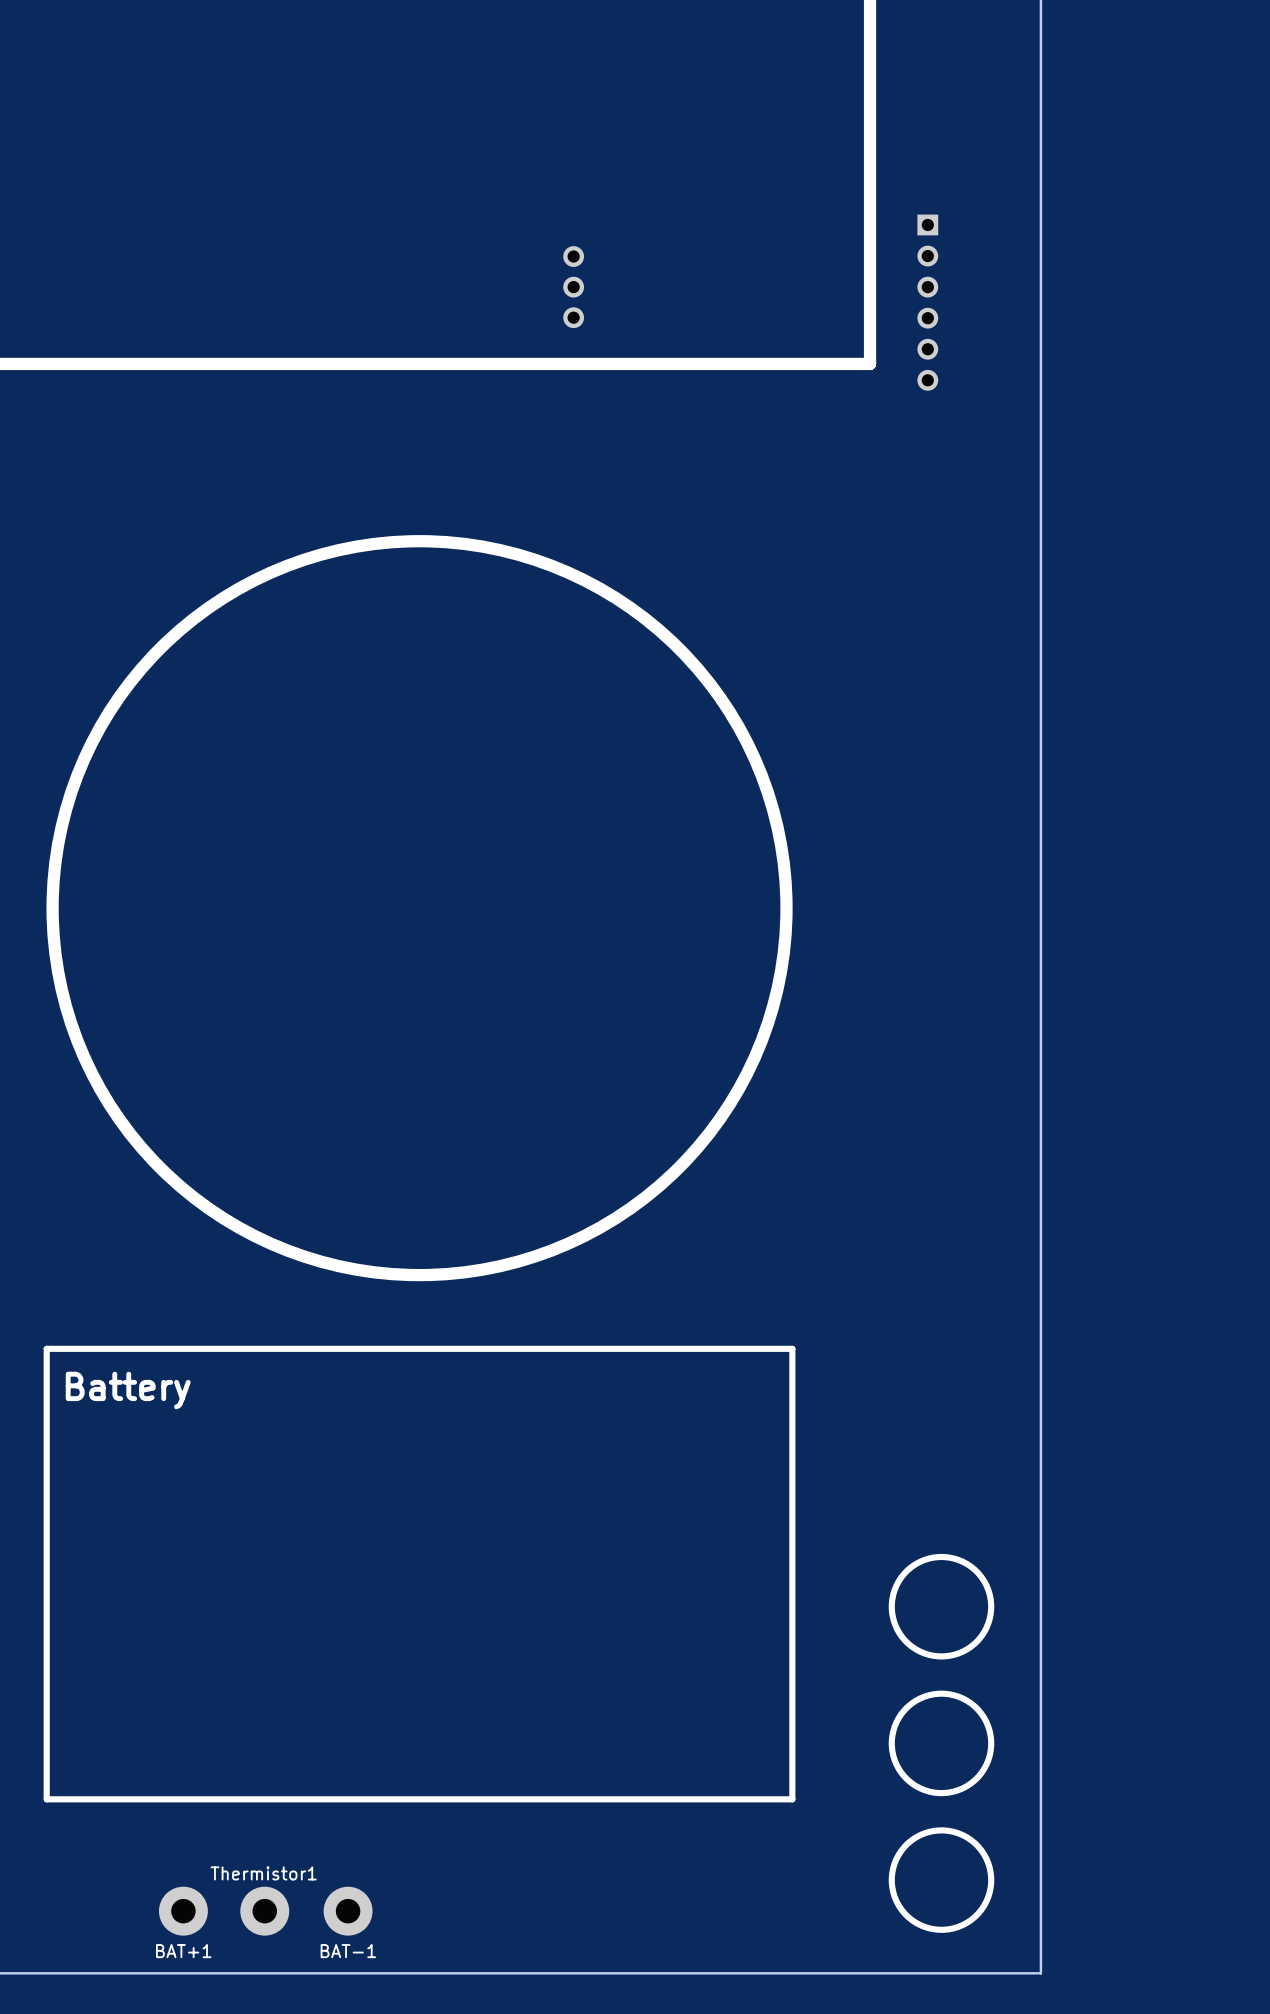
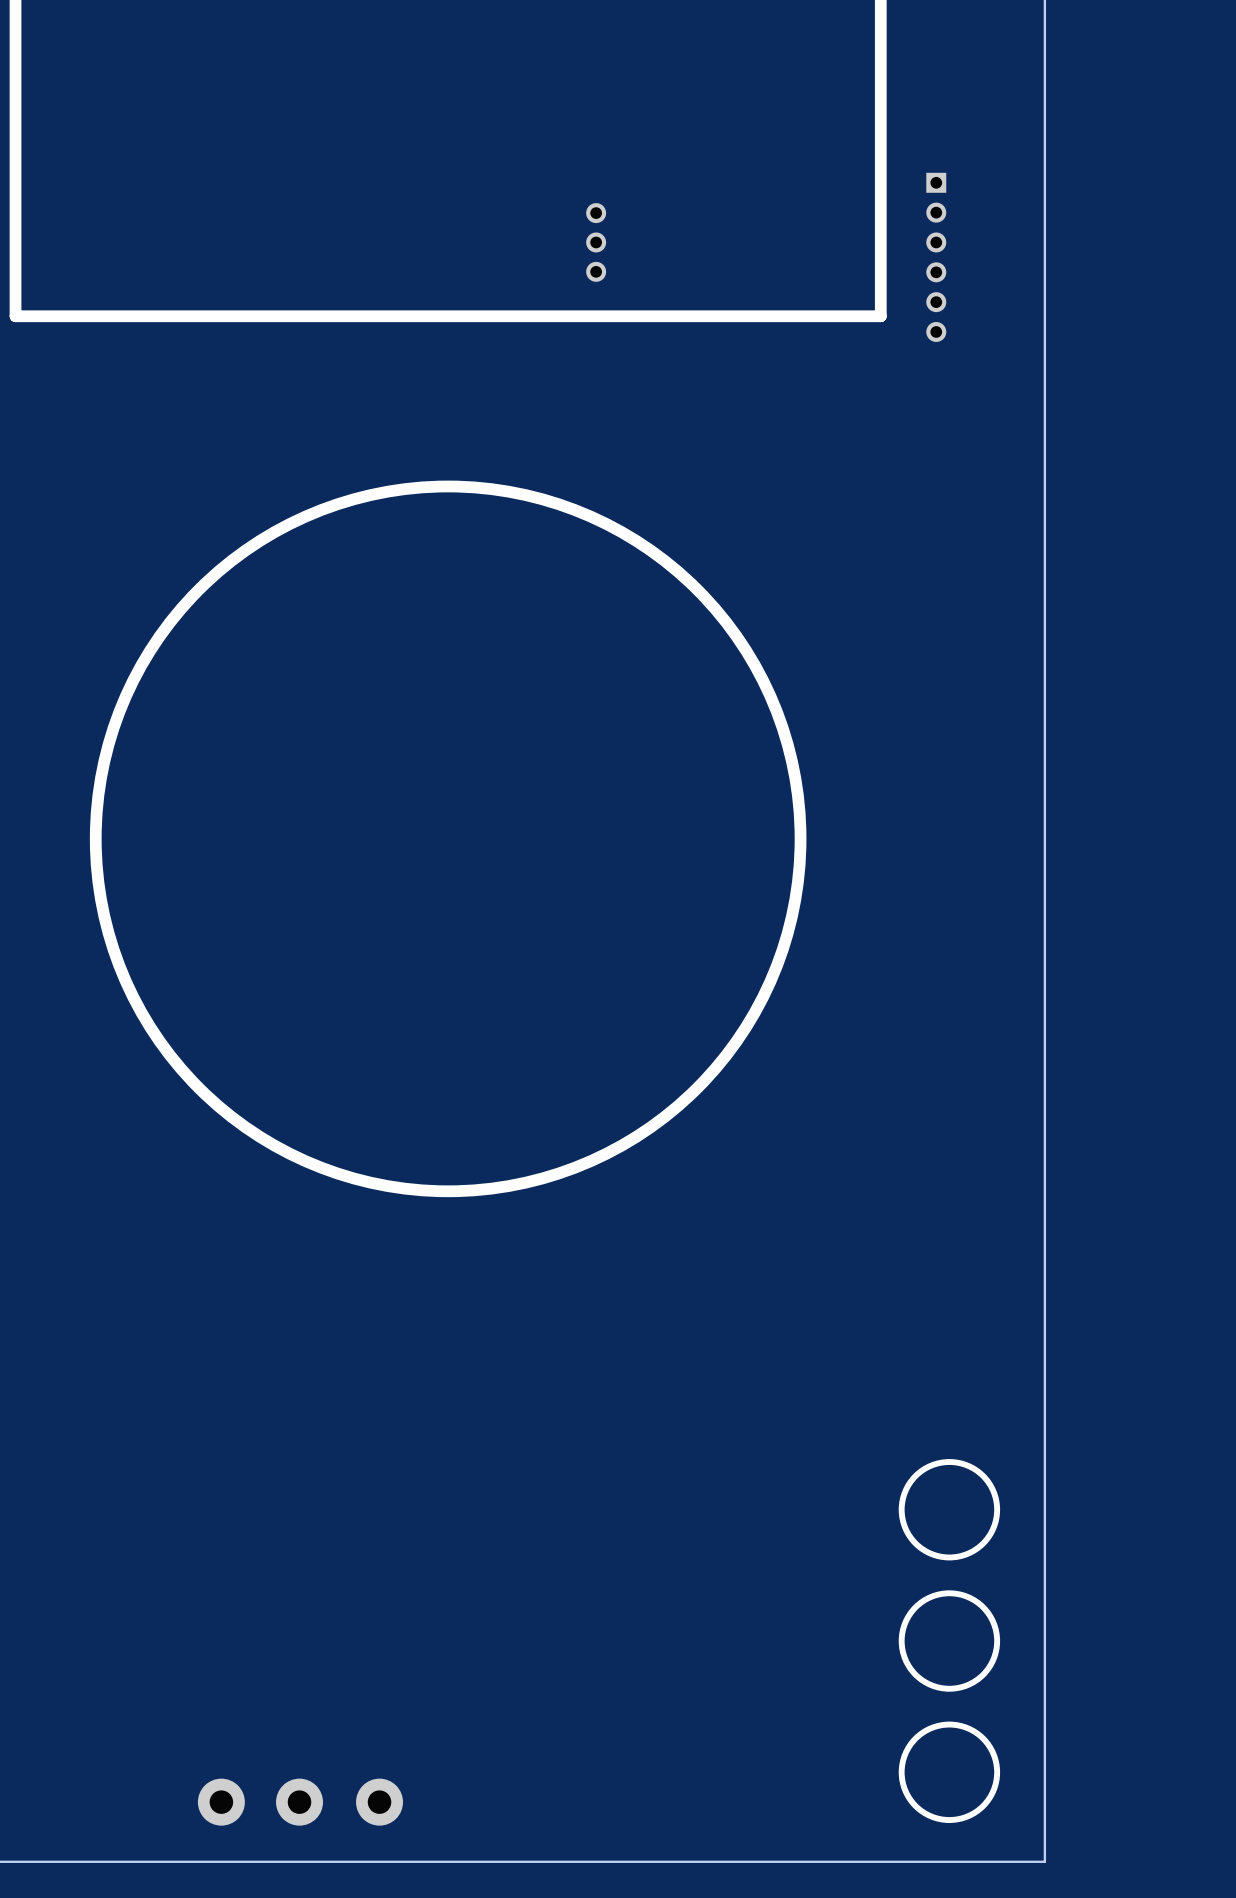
line: (792, 1348) (46, 1348) (46, 1799) (792, 1799) (792, 1348) -> none
text: Battery (128, 1390) -> none
text: Thermistor1 (263, 1873) -> none
text: BAT+1 (183, 1951) -> none
text: BAT-1 (348, 1951) -> none

